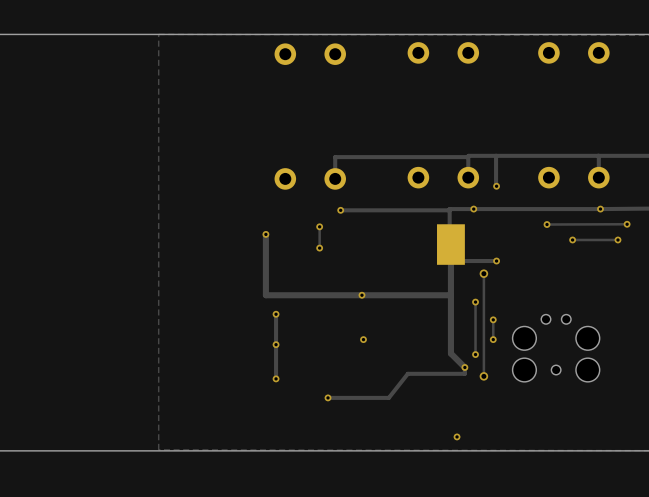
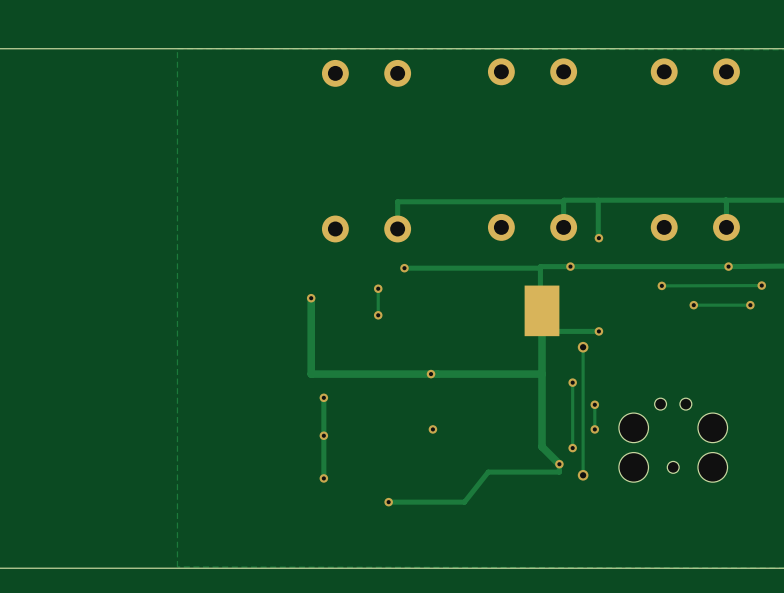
via: (457, 436) -> none

